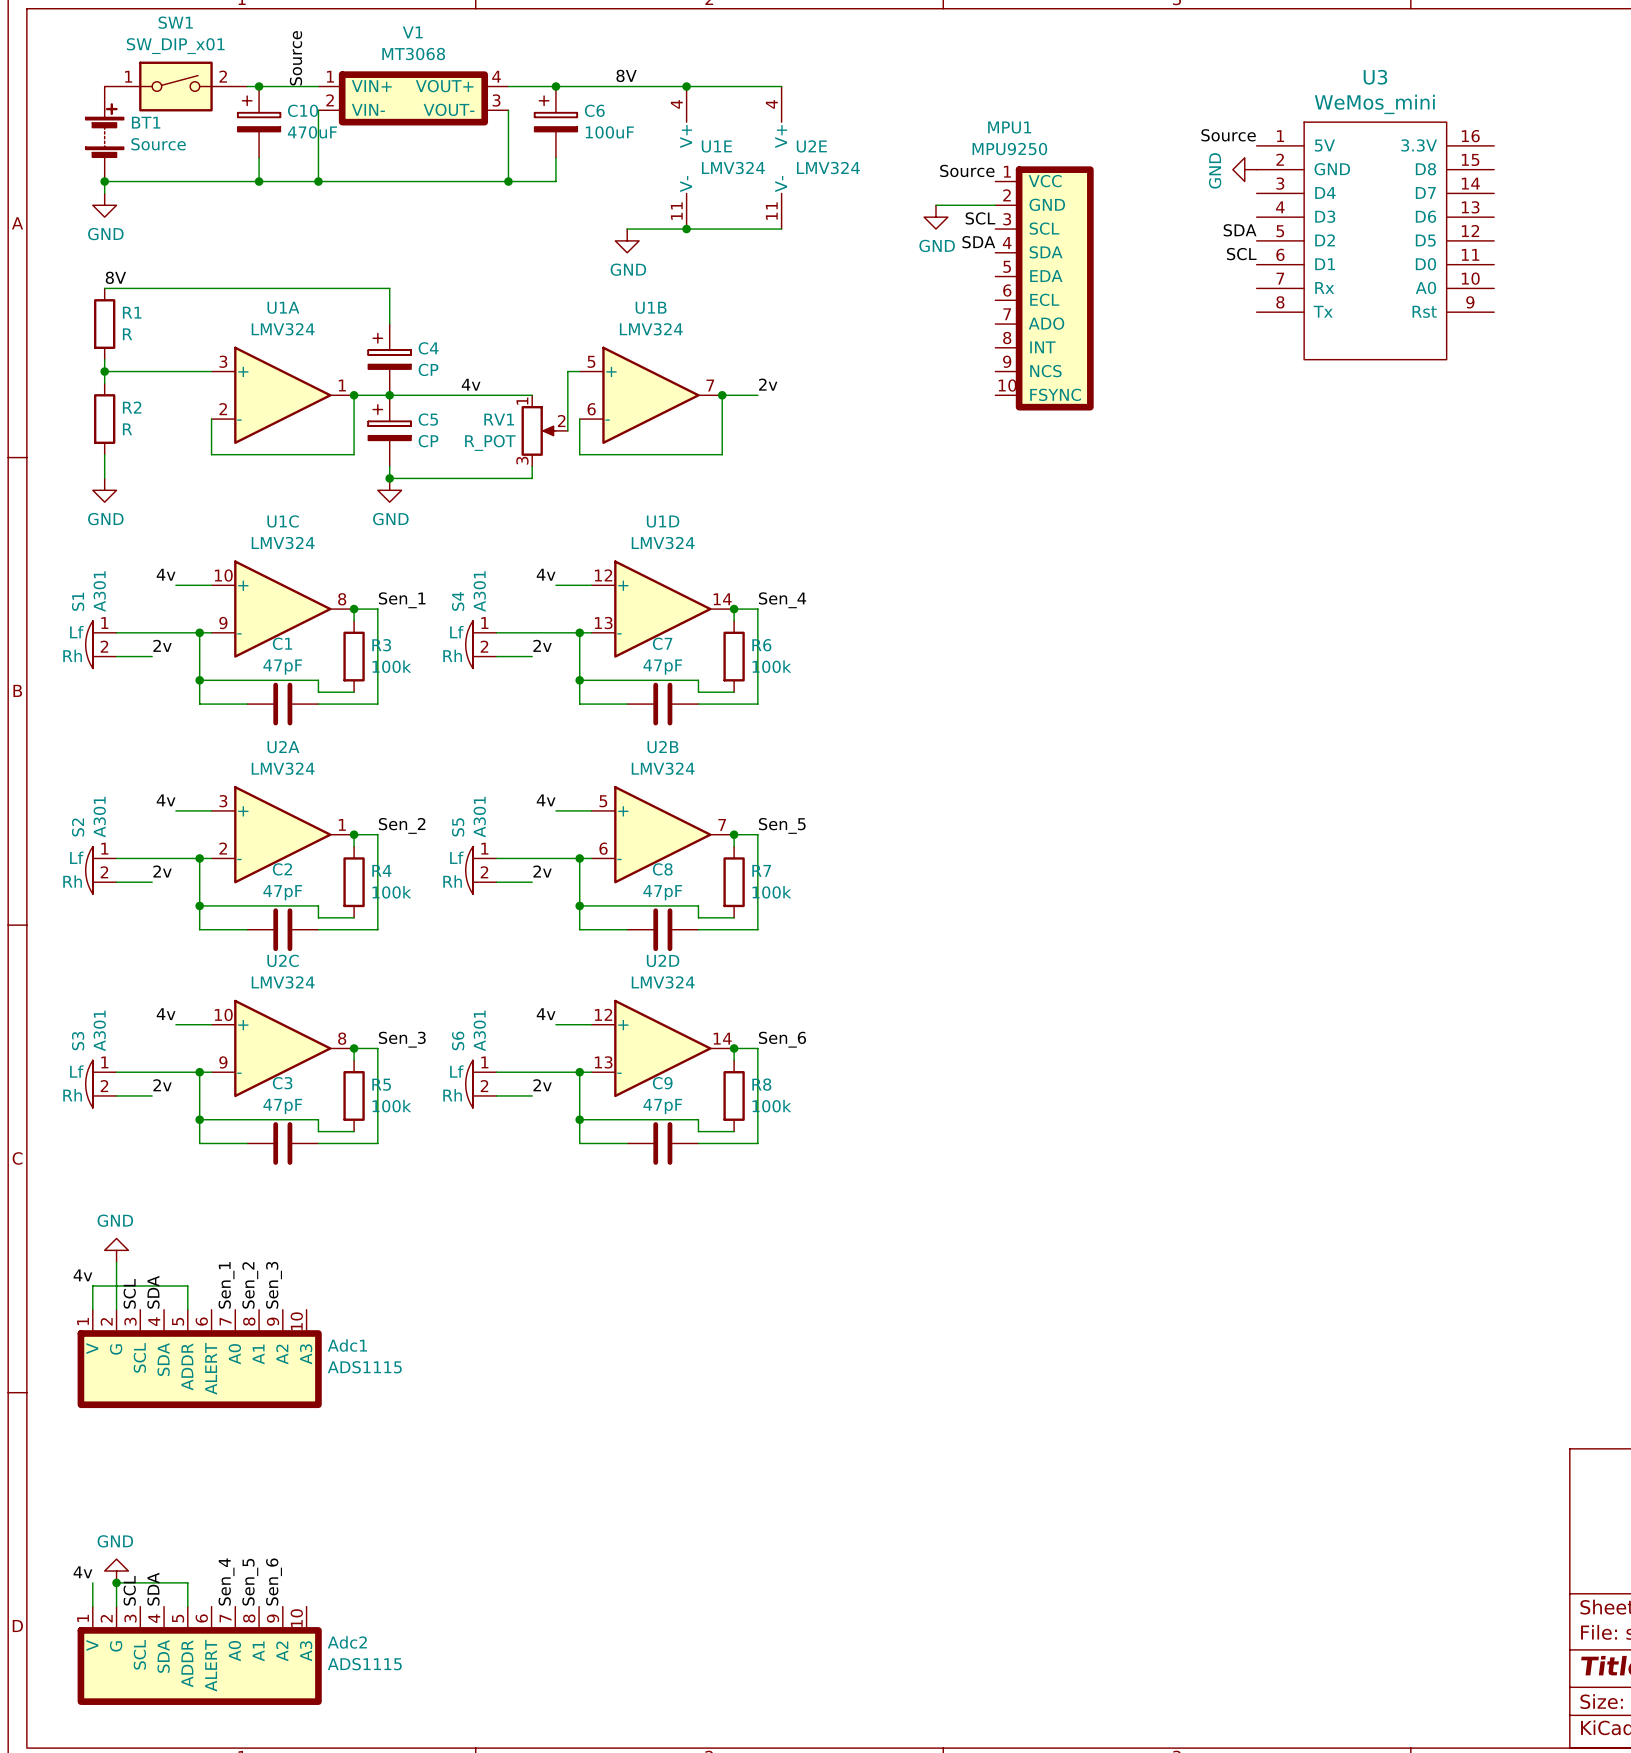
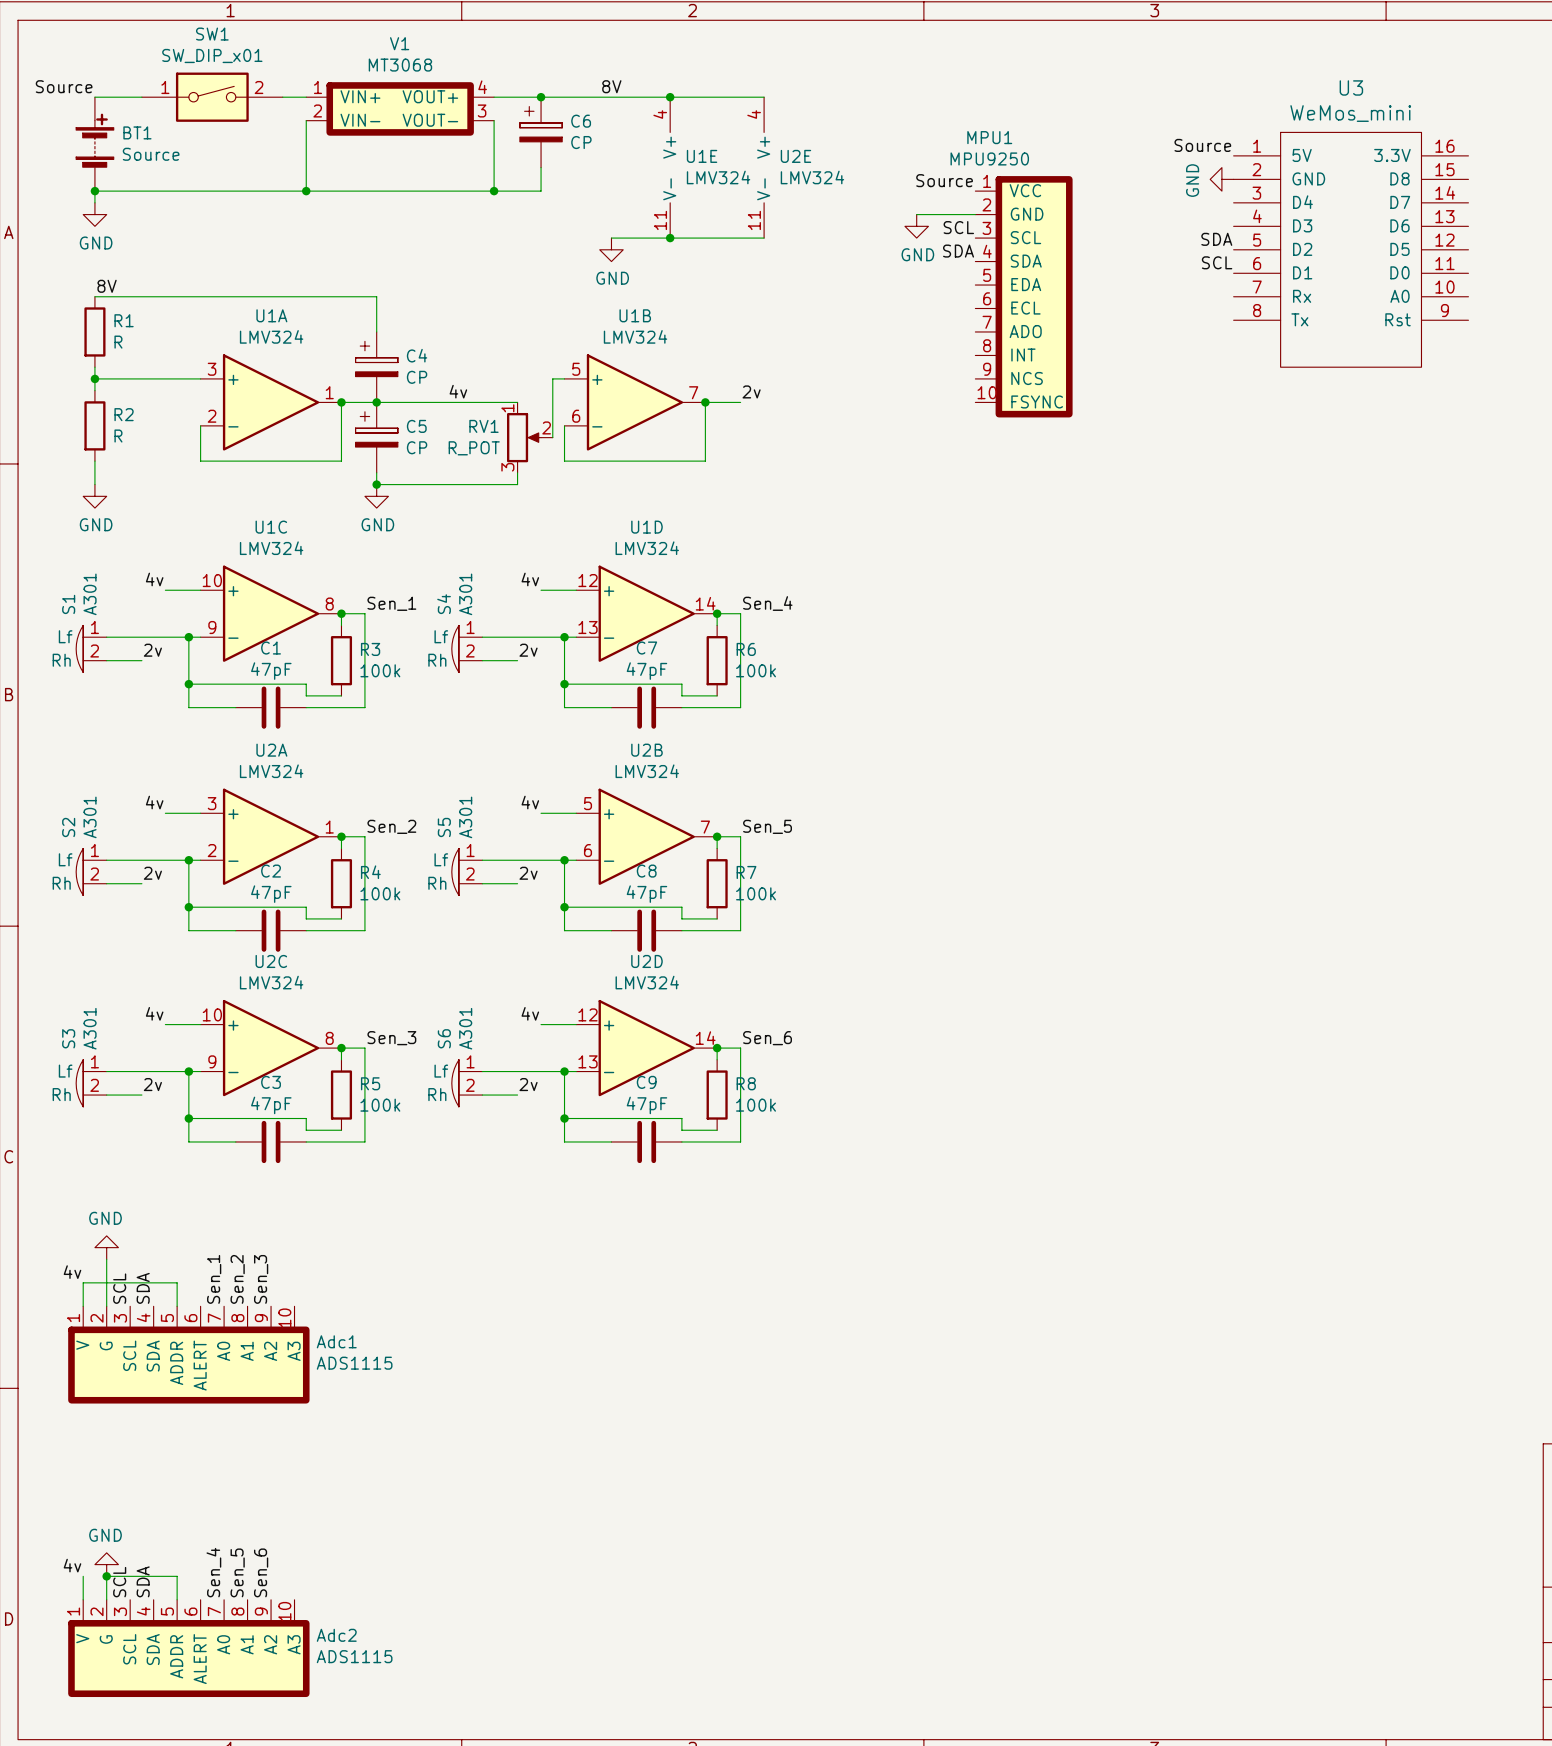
label rotation: 0° (295, 58) -> 90° clockwise (64, 86)
label position: Source (295, 58) -> Source (64, 86)
SW1 position: (175, 86) -> (212, 97)
junction: (259, 86) -> none
C10: 470uF (259, 122) -> none
C6 value: 100uF (609, 132) -> CP (581, 142)
wire: (259, 157) (259, 181) -> none
junction: (259, 181) -> none

